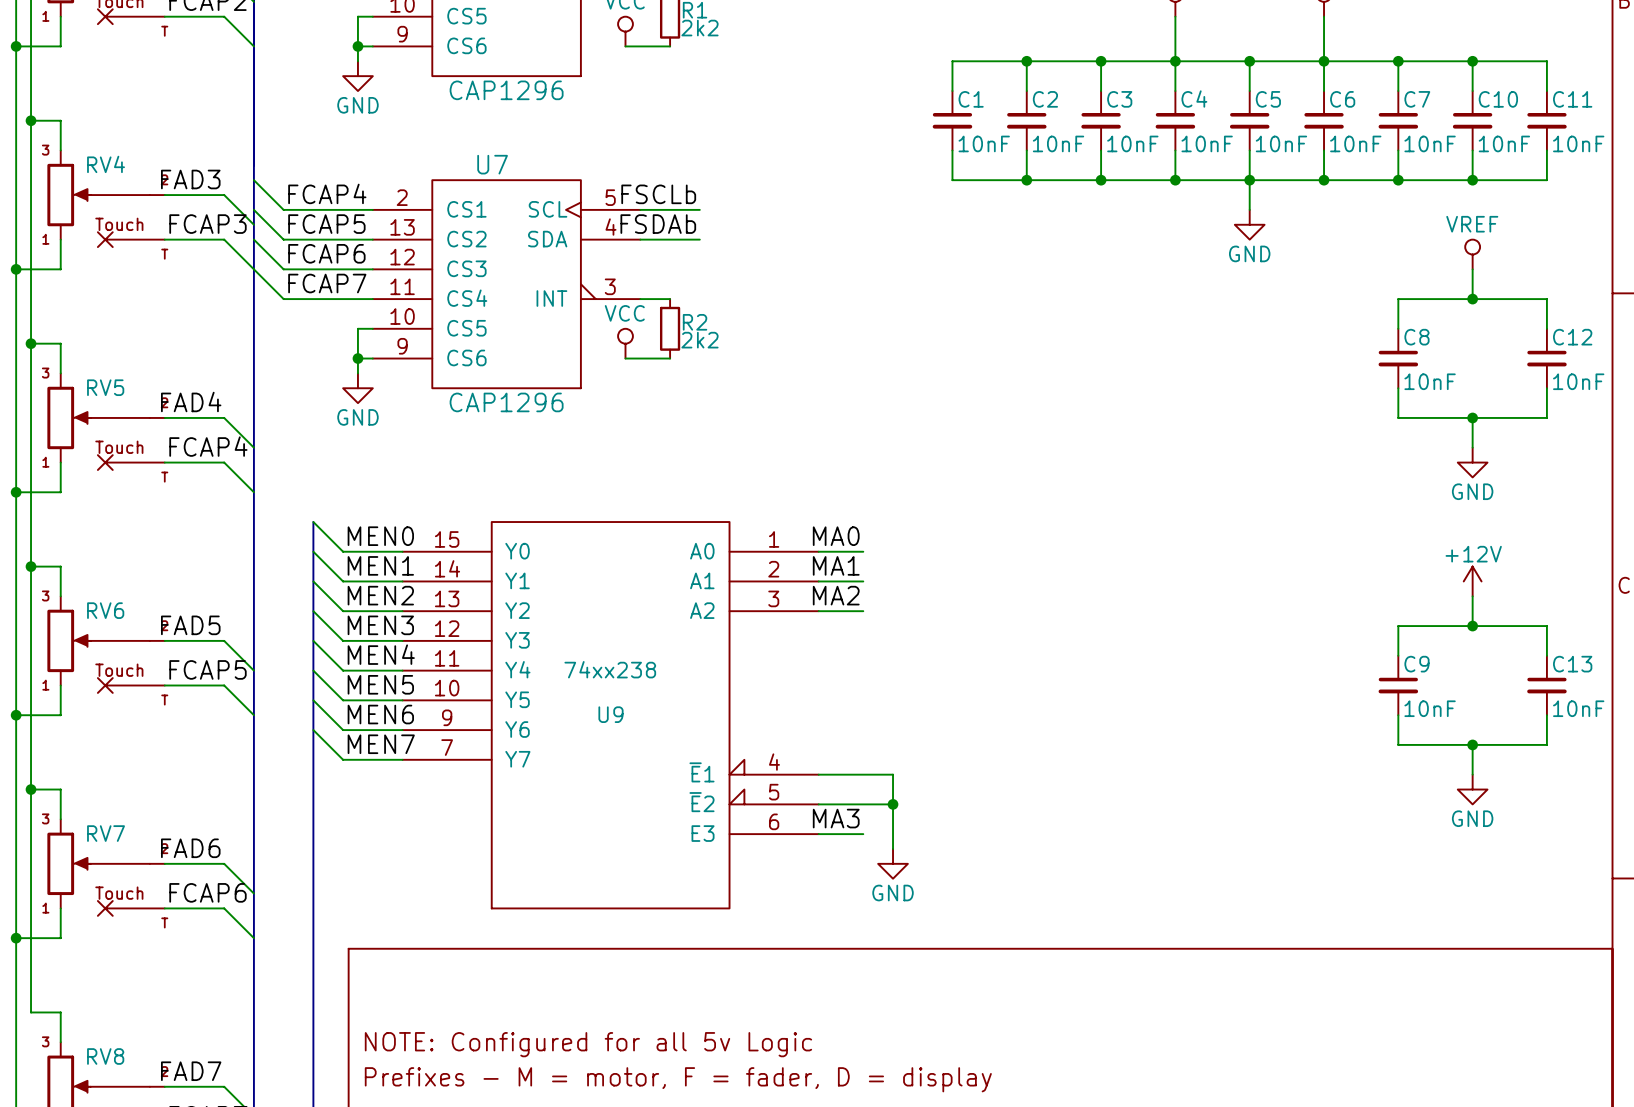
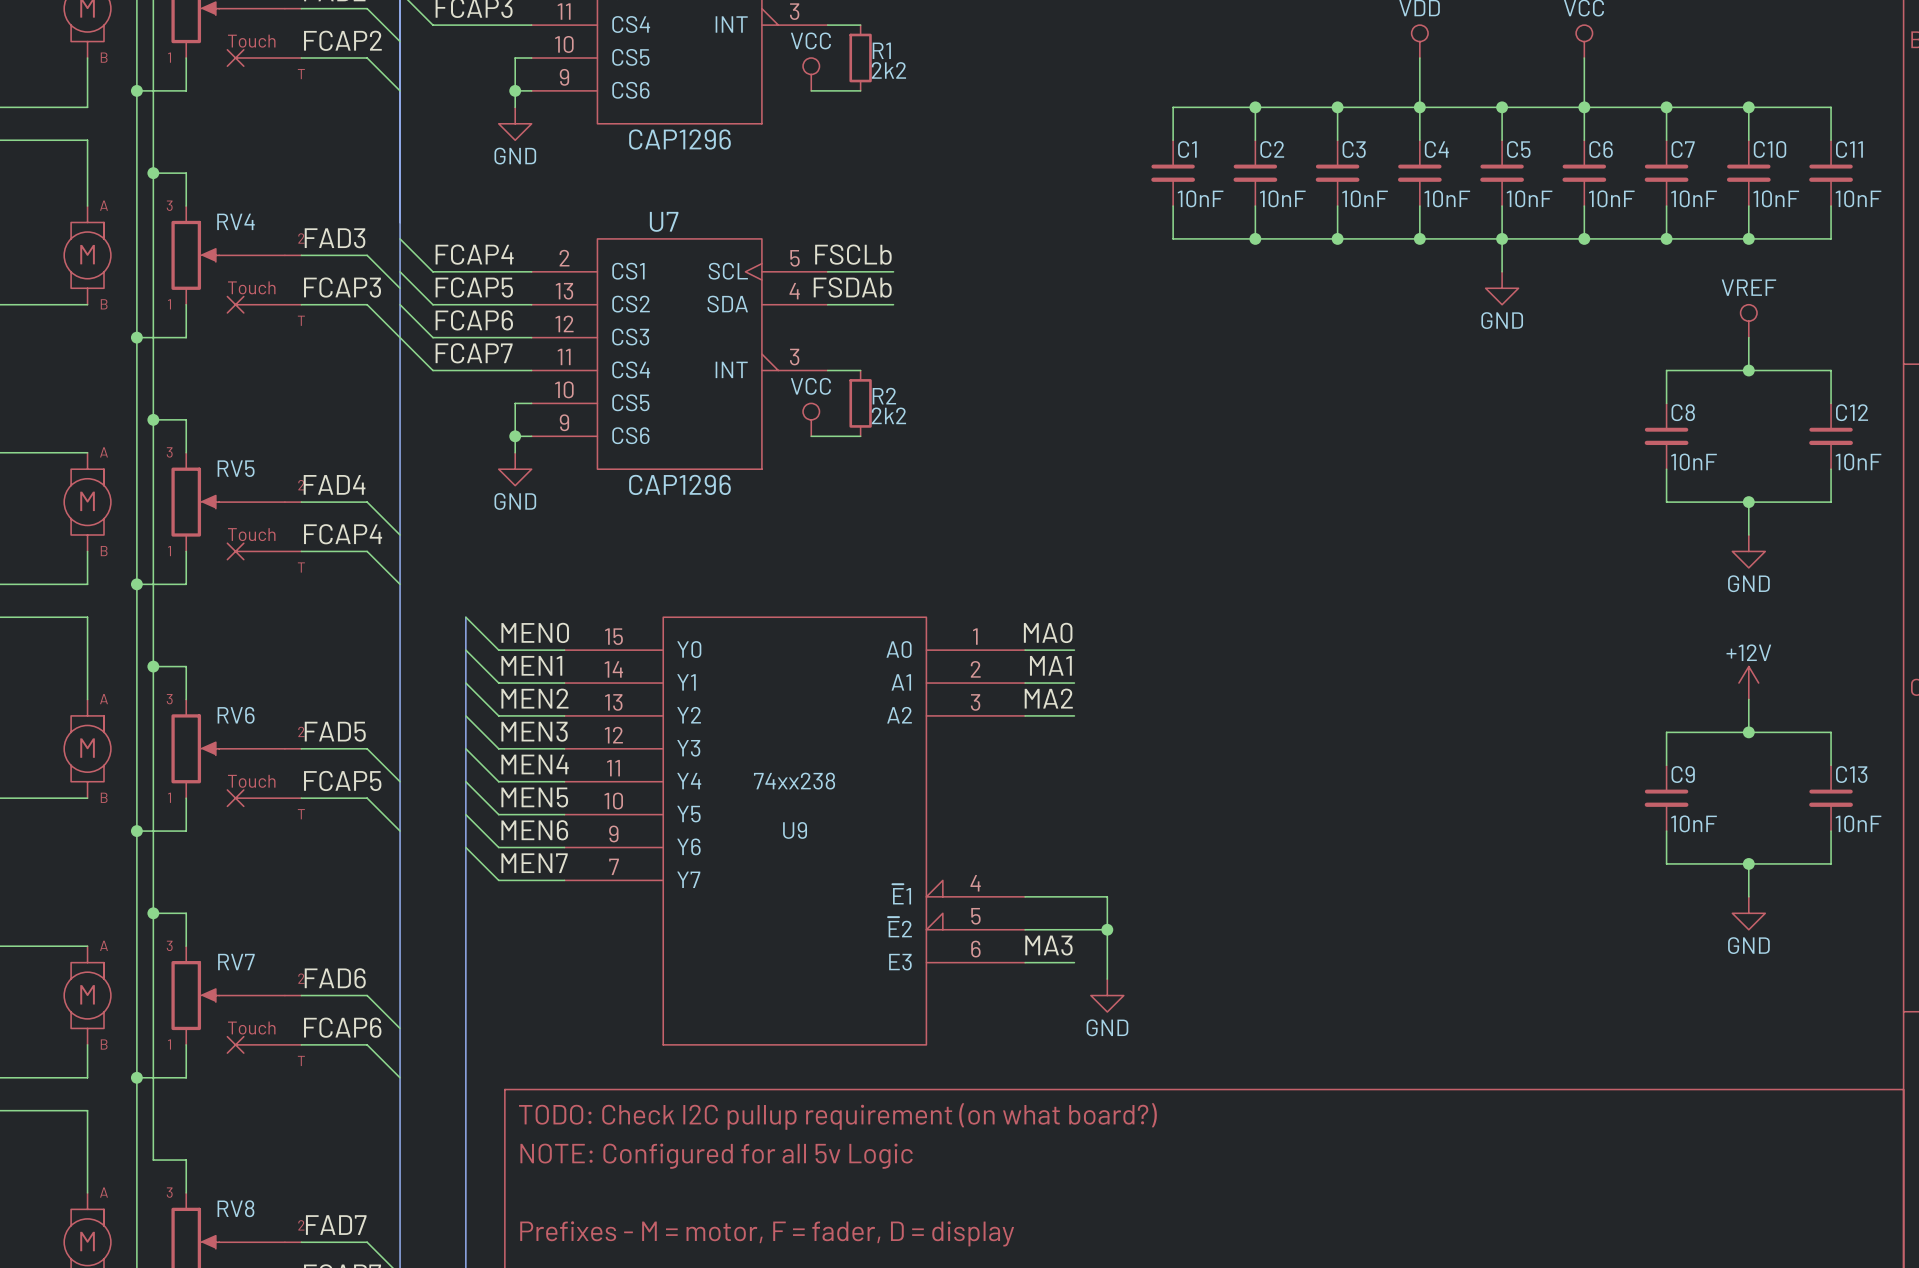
title block: none -> TODO: Check I2C pullup requirement (on what board?) (837, 1116)
title block position: NOTE: Configured for all 5v Logic (588, 1044) -> NOTE: Configured for all 5v Logic (716, 1156)

